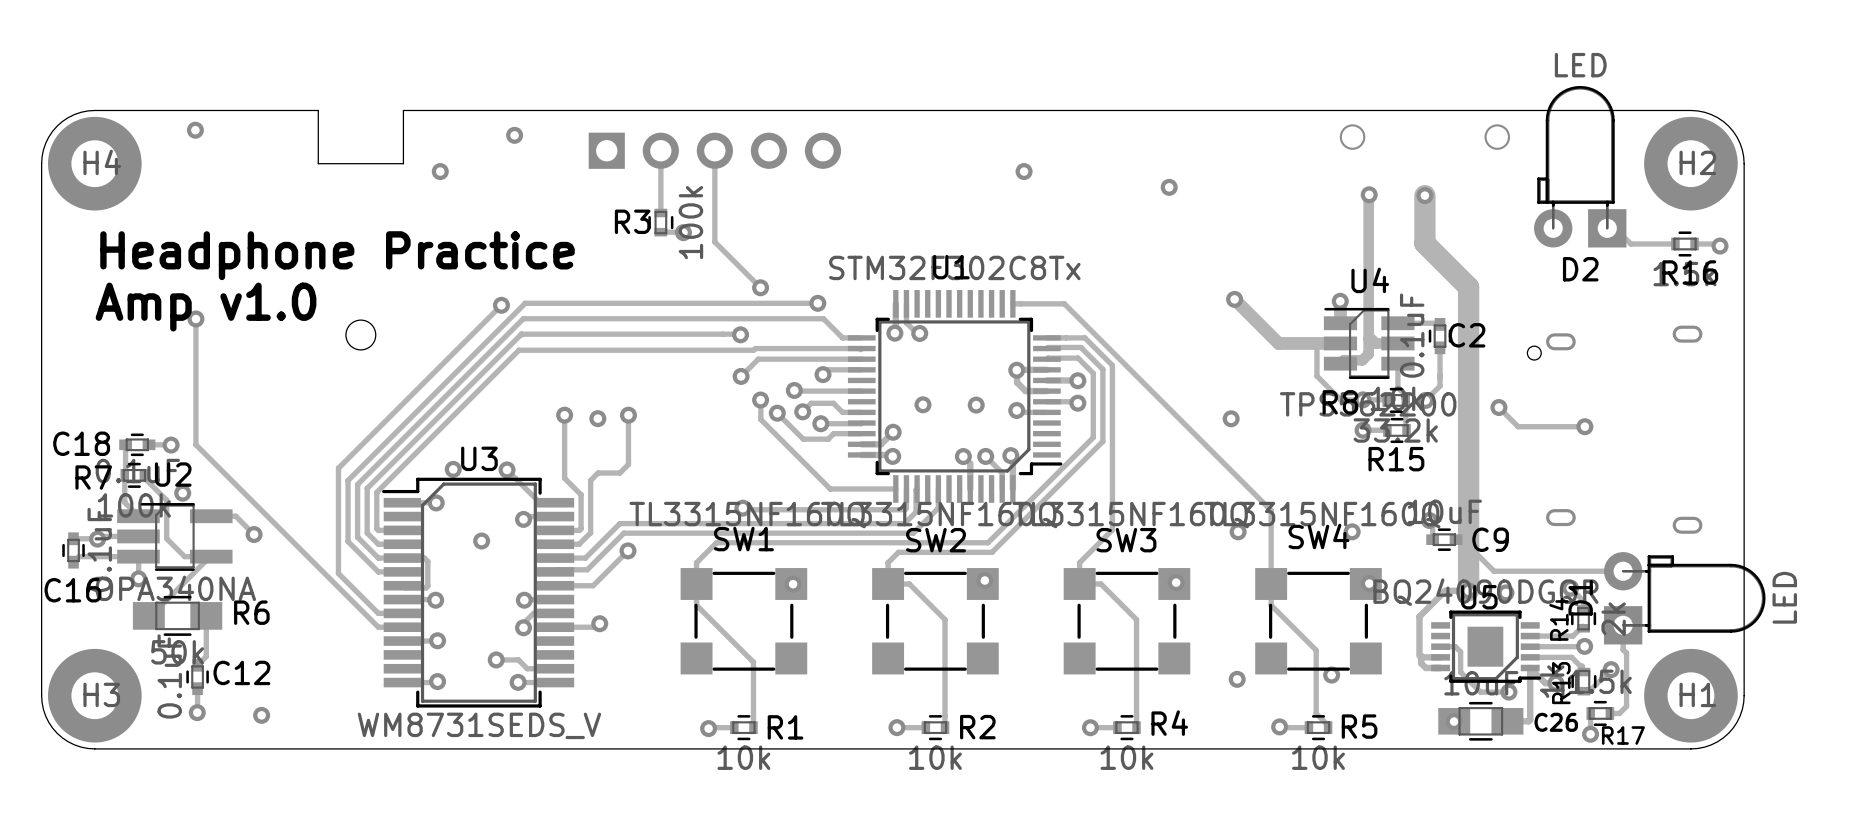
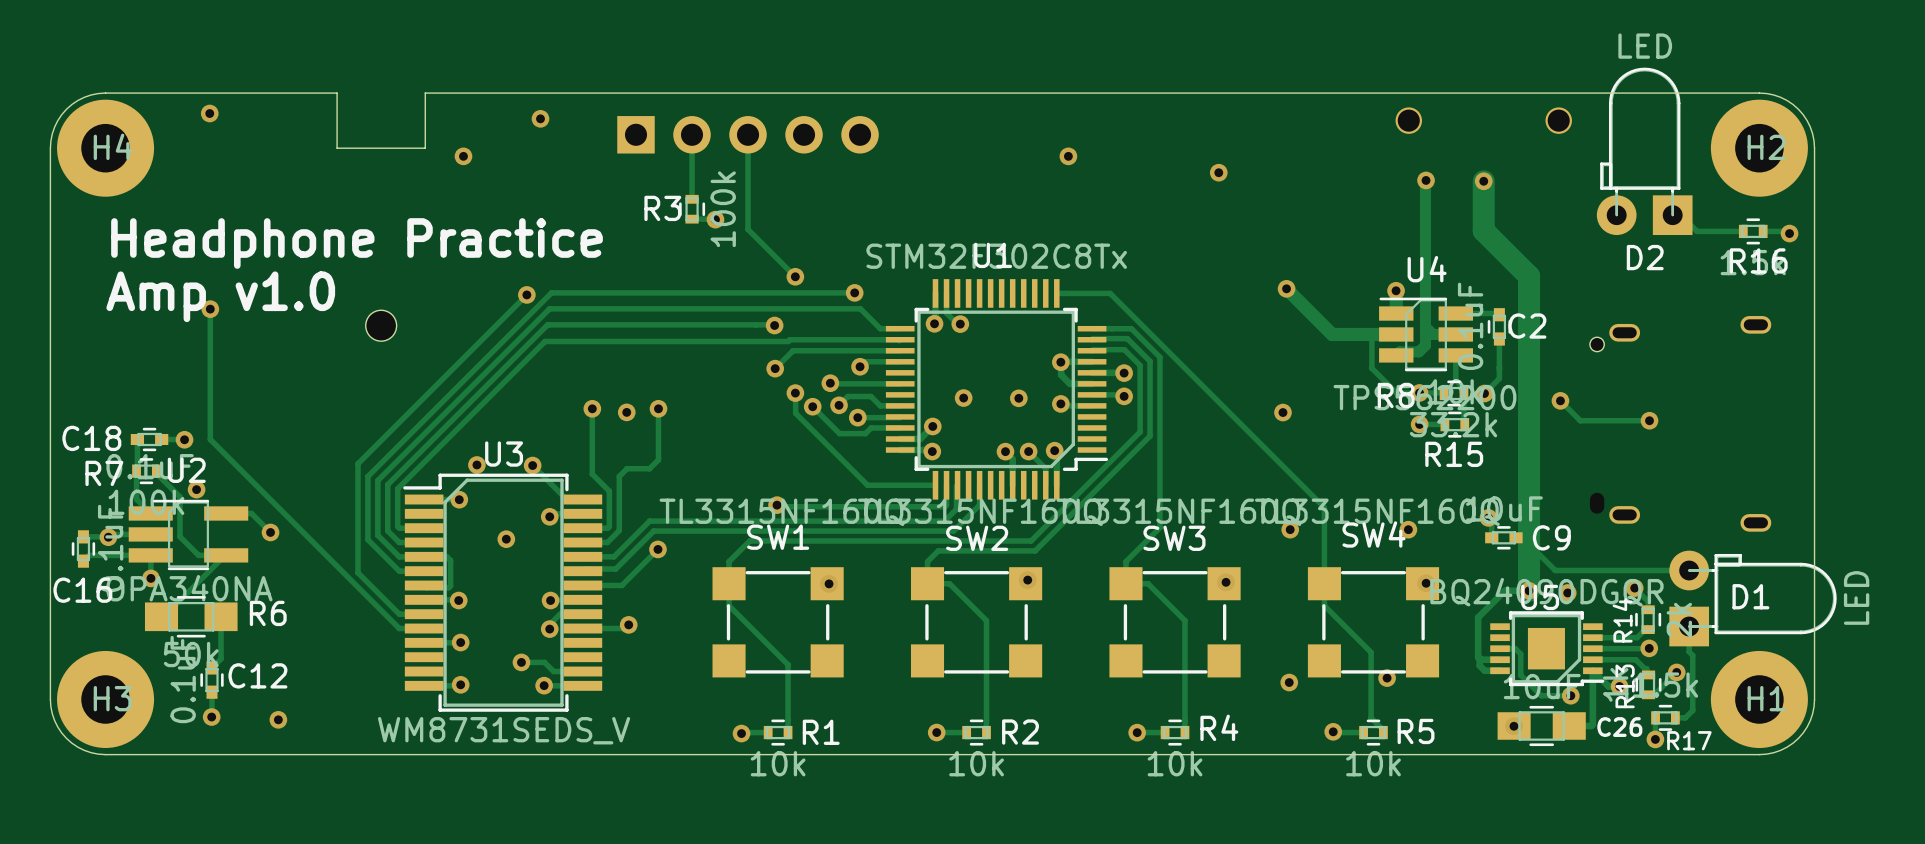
D1 name rotation: 0° (1580, 597) -> 90° clockwise (1750, 596)
D1 name position: D1 (1580, 597) -> D1 (1750, 596)

